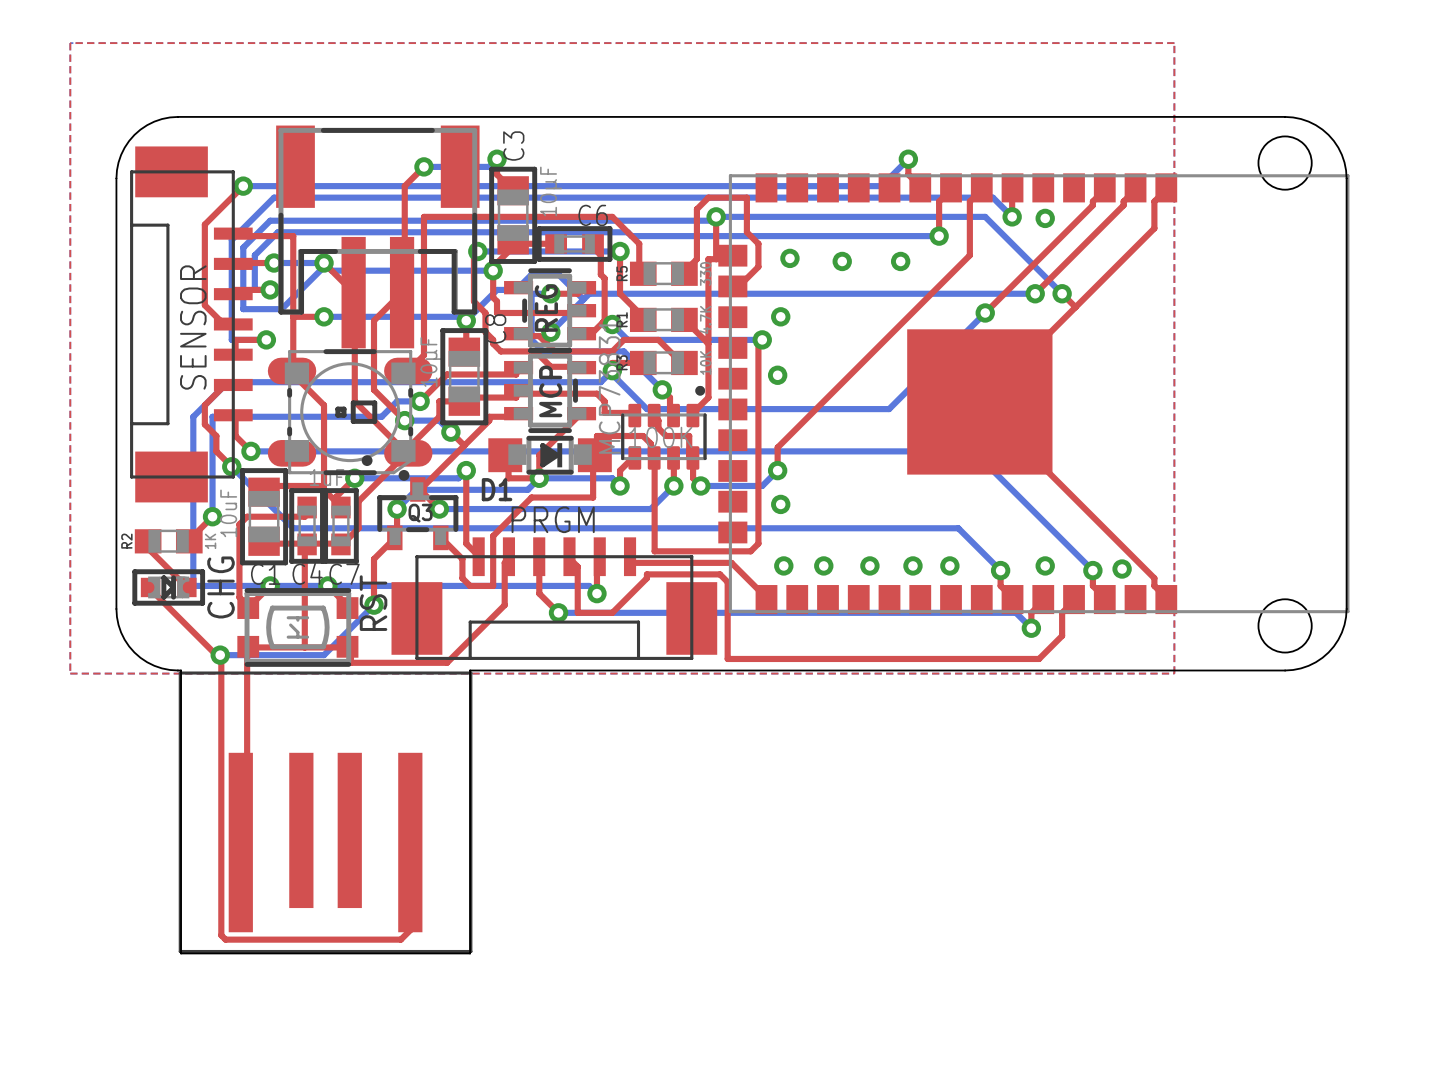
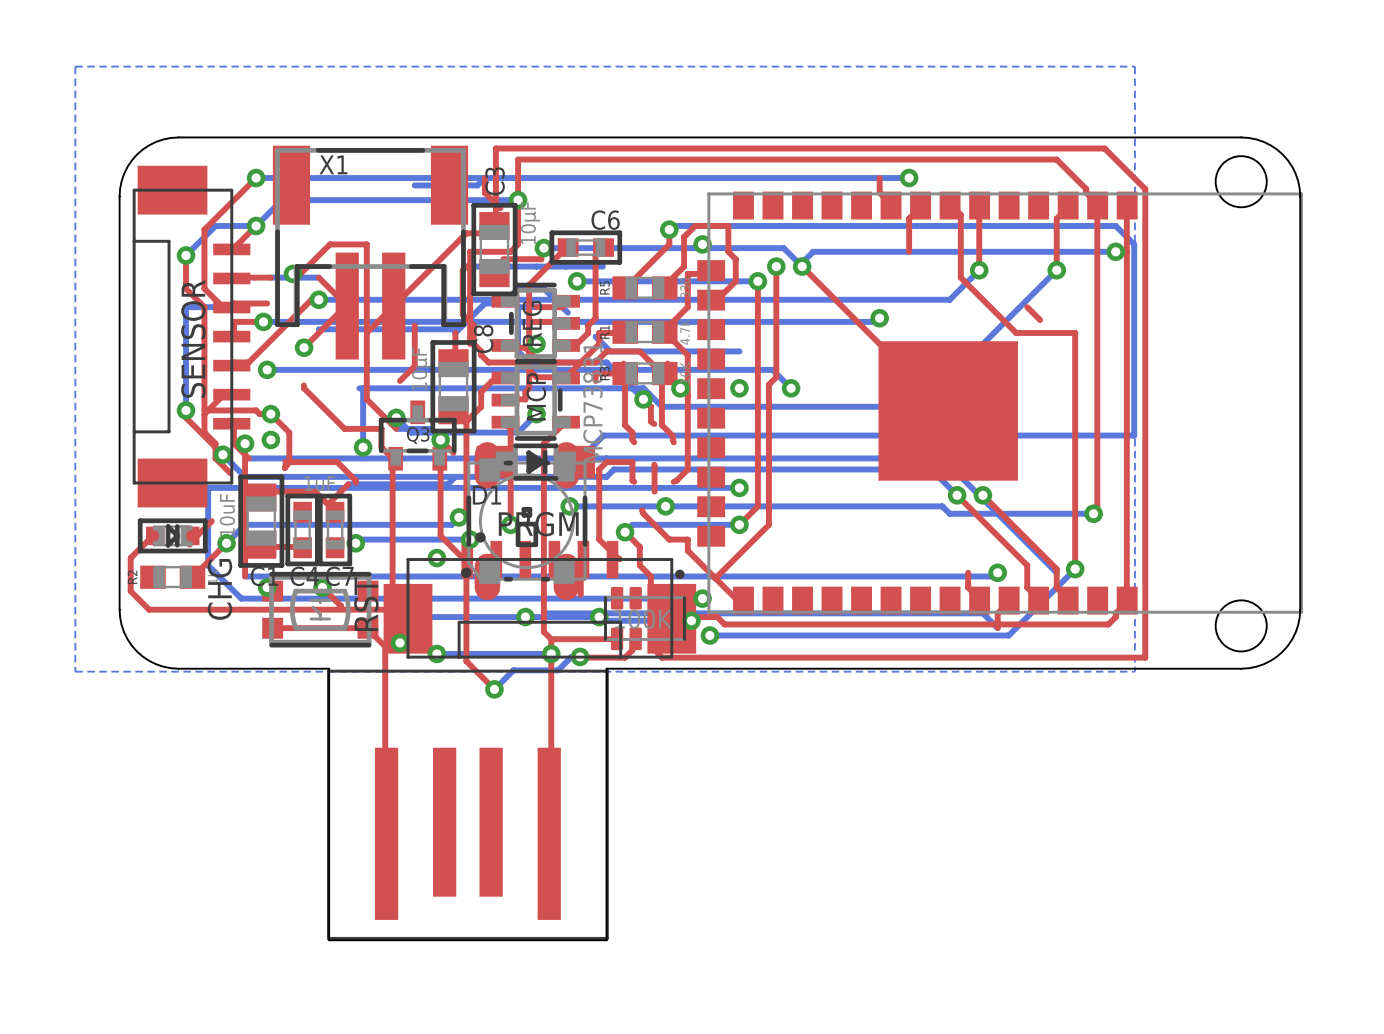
top zone outline: (70, 43) (70, 673) (1174, 673) (1174, 43) (70, 43) -> none
X1 name: none -> X1 (333, 164)
bottom track: none -> (256, 178) (909, 178)
via: none -> (256, 178)
via position: (497, 159) -> (518, 200)
bottom track: (908, 159) (881, 186) (243, 186) -> none
via position: (908, 159) -> (909, 178)
top track: (423, 166) (404, 186) (404, 289) -> none
via: (423, 166) -> none
bottom track: none -> (518, 200) (281, 200) (256, 225) (215, 225) (186, 255)
top track: (243, 186) (204, 224) -> (256, 178) (204, 229) (204, 240)
via: (243, 186) -> none
top track: (981, 187) (969, 201) (969, 255) (777, 447) (777, 470) -> (950, 205) (960, 214) (960, 277) (1016, 332) (1075, 332) (1075, 569)
top track: none -> (1097, 205) (1086, 192) (1086, 189) (1056, 159) (518, 159) (518, 244) (510, 251) (470, 251) (470, 344)
top track: (1135, 189) (1123, 201) (1123, 205) (1035, 293) -> (1097, 207) (1097, 510) (1093, 513)
top track: (1165, 189) (1154, 201) (1154, 228) (979, 401) (1154, 578) (1154, 585) (1165, 597) -> (1126, 207) (1126, 598)
top track: (1092, 205) (985, 312) -> (1056, 222) (1056, 270)
via: none -> (256, 225)
bottom track: none -> (669, 229) (673, 225) (1115, 225) (1134, 244) (1134, 435) (603, 435) (591, 447)
via: none -> (669, 229)
C3 position: (513, 215) -> (494, 249)
top track: (477, 216) (423, 216) (423, 312) -> (466, 233) (396, 303)
top track: (504, 216) (612, 216) (639, 243) (639, 266) (643, 273) -> (669, 229) (669, 244) (625, 287)
top track: none -> (492, 233) (492, 225) (495, 225) (495, 148) (1104, 148) (1145, 189) (1145, 657) (1005, 657)
top track: (716, 216) (716, 259) -> none
via position: (716, 216) -> (702, 244)
top track: none -> (979, 233) (979, 270)
bottom track: (1012, 216) (992, 197) (274, 197) (231, 239) (231, 339) (266, 339) -> none
via: (1012, 216) -> none
via: (1045, 218) -> none
top track: none -> (568, 247) (529, 285) (529, 388) (525, 392) (525, 399) (505, 400)
bottom track: (558, 232) (277, 232) (254, 255) (254, 289) (270, 289) -> none
via: none -> (543, 248)
bottom track: (627, 232) (631, 236) (839, 236) -> (610, 248) (698, 248) (702, 244) (702, 248) (783, 248) (802, 266) (802, 262) (813, 251)
top track: (233, 233) (235, 236) (293, 236) (292, 371) (324, 405) (324, 485) (322, 487) -> (231, 249) (256, 225)
top track: (750, 236) (746, 232) (746, 197) (708, 197) (696, 209) (696, 259) -> (728, 251) (728, 225) (695, 225) (684, 237) (684, 266) (676, 273)
bottom track: none -> (909, 251) (1115, 251)
via: (939, 236) -> none
via: none -> (1115, 251)
top track: none -> (186, 255) (186, 288) (204, 307)
via: none -> (186, 255)
top track: (516, 243) (493, 266) (493, 297) (497, 301) (497, 312) (577, 312) (581, 310) -> (529, 321) (565, 323)
C6 position: (574, 243) -> (585, 247)
top track: (593, 243) (593, 247) (600, 255) (600, 274) (604, 278) (604, 312) -> (603, 247) (595, 255) (595, 318) (588, 325)
via: (477, 251) -> none
top track: (620, 251) (620, 293) (643, 316) (643, 319) -> (565, 378) (599, 344) (599, 332) (625, 332)
via: (620, 251) -> none
top track: none -> (776, 266) (776, 377) (768, 384) (768, 524) (715, 578)
via: none -> (776, 266)
top track: none -> (802, 266) (948, 410)
bottom track: none -> (979, 270) (949, 299) (318, 299)
via: none -> (979, 270)
bottom track: none -> (1056, 270) (920, 406) (661, 406) (643, 388) (359, 388)
via: none -> (1056, 270)
via: (789, 258) -> none
top track: none -> (293, 273) (300, 273) (329, 244) (366, 244) (366, 332)
via: none -> (293, 273)
via position: (842, 261) -> (802, 266)
via: (900, 261) -> none
via: (274, 263) -> none
via: (324, 263) -> none
bottom track: none -> (577, 281) (757, 281)
via: none -> (577, 281)
top track: none -> (757, 281) (757, 506) (739, 524)
via: none -> (757, 281)
bottom track: (493, 270) (331, 270) (324, 263) (324, 266) (281, 309) -> (879, 318) (875, 321) (278, 321)
via: (493, 270) -> none
top track: (204, 274) (204, 293) -> (204, 288) (222, 307) (231, 307)
via: none -> (318, 299)
via position: (270, 289) -> (263, 321)
bottom track: none -> (231, 304) (230, 307) (186, 307) (186, 410)
top track: (353, 292) (354, 401) (408, 453) -> (347, 306) (304, 347)
via: (550, 293) -> none
top track: (708, 293) (708, 339) (706, 341) -> (687, 307) (664, 332)
bottom track: (1035, 293) (589, 293) (550, 332) -> none
via: (1035, 293) -> none
bottom track: (1062, 293) (985, 216) (716, 216) (712, 220) (270, 220) (243, 247) (243, 309) (266, 309) -> none
via: (1062, 293) -> none
top track: (204, 305) (220, 320) (231, 320) (233, 324) -> (263, 321) (233, 321) (233, 332) (231, 336)
top track: none -> (204, 318) (204, 410) (256, 410) (259, 414) (270, 414) (289, 432) (289, 462) (284, 468) (285, 462) (337, 462) (355, 482)
via: none -> (879, 318)
bottom track: (985, 312) (889, 409) (646, 409) (612, 374) (612, 370) (600, 382) (227, 382) (193, 416) (193, 585) (589, 585) (596, 593) -> none
via: (985, 312) -> none
top track: (293, 316) (324, 316) -> none
via: (324, 316) -> none
via: (780, 316) -> none
via: (466, 320) -> none
via: (612, 324) -> none
via: none -> (304, 347)
top track: (266, 339) (235, 339) (235, 351) -> (318, 299) (311, 299) (248, 362) (233, 362)
via position: (266, 339) -> (267, 369)
top track: (762, 339) (758, 343) (758, 543) (750, 551) (654, 551) (654, 459) (650, 455) (650, 443) (643, 436) (596, 436) (596, 455) (593, 455) (593, 497) (531, 497) (493, 535) (493, 585) (470, 585) (462, 578) (462, 559) (440, 537) -> none
via: (762, 339) -> none
top track: none -> (623, 363) (625, 425) (632, 432) (634, 442)
top track: none -> (667, 363) (661, 369) (661, 425) (673, 436) (673, 442)
bottom track: none -> (267, 369) (772, 369) (791, 388)
top track: (516, 370) (516, 374) (447, 374) (420, 401) -> (503, 380) (492, 380) (481, 392) (481, 406) (466, 421) (466, 510) (459, 517)
via: (612, 370) -> none
top track: none -> (303, 385) (304, 388) (344, 428) (381, 428) (381, 447) (392, 458) (395, 458) (392, 462) (392, 609)
via position: (777, 375) -> (739, 388)
bottom track: none -> (363, 388) (363, 447)
via: none -> (680, 388)
via: none -> (791, 388)
top track: (708, 397) (693, 412) (692, 415) -> (687, 406) (687, 469) (673, 481)
top track: none -> (186, 410) (186, 417) (222, 454)
via: none -> (186, 410)
bottom track: (420, 401) (397, 401) (381, 416) (212, 416) (212, 516) -> none
via: (420, 401) -> none
via: none -> (270, 414)
bottom track: none -> (536, 414) (518, 432) (411, 432) (396, 417)
via: none -> (536, 414)
via: none -> (396, 417)
top track: (518, 413) (516, 416) (489, 416) (489, 420) (423, 485) (423, 489) (417, 489) (439, 509) -> (505, 422) (510, 428) (510, 524)
part rotation: 0° (350, 414) -> 90° clockwise (524, 521)
part position: (350, 414) -> (524, 521)
top track: (634, 415) (631, 412) (604, 412) (604, 401) (596, 393) (520, 393) (518, 390) (516, 397) (466, 397) (464, 401) (439, 401) (439, 416) (408, 447) (408, 453) -> none
top track: (654, 415) (658, 420) (658, 428) (666, 436) (689, 436) (689, 455) (693, 459) (693, 478) (700, 485) -> none
via: (404, 420) -> none
top track: none -> (436, 432) (436, 458) (439, 458) (440, 462) (440, 535) (466, 561) (466, 661) (494, 689)
part position: (663, 427) -> (644, 609)
via: none -> (270, 439)
top track: none -> (245, 443) (245, 576)
top track: (558, 436) (539, 455) (539, 478) (508, 478) (508, 455) (505, 455) -> (543, 443) (543, 631) (551, 639)
via: none -> (363, 447)
bottom track: none -> (222, 454) (245, 476) (606, 476) (613, 469) (931, 469) (957, 495)
via position: (250, 451) -> (245, 443)
top track: (408, 453) (358, 501) (358, 528) (343, 543) (308, 543) (304, 547) (304, 647) -> none
top track: (634, 457) (620, 470) (620, 485) -> none
bottom track: (231, 466) (293, 528) (958, 528) (1000, 570) -> none
via position: (231, 466) -> (222, 454)
top track: (466, 470) (466, 543) (478, 556) -> none
via: (466, 470) -> none
bottom track: (777, 470) (762, 485) (700, 485) -> none
via position: (777, 470) -> (739, 487)
top track: none -> (634, 481) (632, 480) (632, 462) (606, 462) (599, 469) (599, 539) (619, 559)
via: (354, 478) -> none
via: (539, 478) -> none
bottom track: none -> (739, 487) (208, 487) (208, 565) (241, 598) (702, 598)
bottom track: (620, 485) (612, 478) (539, 478) (527, 489) (416, 489) (397, 509) -> none
via: (620, 485) -> none
bottom track: (673, 485) (650, 509) (439, 509) -> none
via: (673, 485) -> none
via: (700, 485) -> none
via: none -> (957, 495)
top track: none -> (982, 495) (1056, 569) (1056, 572)
via: none -> (982, 495)
bottom track: none -> (569, 506) (942, 506) (949, 513) (1093, 513)
via: none -> (569, 506)
via: none -> (665, 506)
via: (780, 504) -> none
top track: (307, 507) (304, 509) (304, 516) (247, 516) (239, 524) (239, 597) (248, 608) (270, 585) -> none
top track: (397, 509) (397, 535) (374, 559) (374, 605) -> none
via: (397, 509) -> none
via: (439, 509) -> none
via: none -> (1093, 513)
bottom track: none -> (459, 517) (451, 524) (245, 524) (226, 543)
via: none -> (459, 517)
Q3 position: (417, 513) -> (417, 435)
via position: (212, 516) -> (226, 543)
via: none -> (510, 524)
bottom track: none -> (739, 524) (632, 524) (625, 532)
via: none -> (739, 524)
top track: none -> (625, 532) (639, 546) (639, 565) (650, 576) (650, 594) (654, 598)
via: none -> (625, 532)
top track: none -> (155, 535) (152, 535) (130, 558) (130, 591) (149, 609) (392, 609)
bottom track: none -> (470, 539) (359, 539) (355, 543)
via: none -> (470, 539)
top track: none -> (226, 543) (192, 577)
via: none -> (355, 543)
top track: (148, 541) (151, 543) (151, 551) (186, 587) -> none
R2 position: (168, 541) -> (172, 577)
via: none -> (436, 558)
top track: (508, 556) (504, 562) (504, 605) (447, 662) (350, 662) (350, 647) (347, 646) (247, 647) (247, 835) (240, 842) -> none
top track: (539, 556) (539, 593) (558, 612) -> none
top track: (569, 556) (577, 566) (577, 612) (612, 612) (646, 578) (646, 574) (719, 574) (727, 582) (727, 658) -> (654, 639) (658, 642) (658, 653) (661, 657) (706, 657)
top track: (630, 556) (631, 562) (731, 562) (766, 597) -> (642, 510) (669, 539) (687, 539) (687, 550) (735, 598) (743, 598)
via: (783, 565) -> none
via: (823, 565) -> none
via: (869, 565) -> none
via: (912, 565) -> none
via: (949, 565) -> none
via position: (1045, 565) -> (997, 572)
bottom track: none -> (1075, 569) (1008, 635) (709, 635)
via: none -> (1075, 569)
via: (1122, 569) -> none
via: (1000, 570) -> none
bottom track: none -> (997, 572) (994, 576) (245, 576)
via: (1092, 570) -> none
top track: (150, 587) (218, 657) (221, 656) (221, 935) (225, 939) (400, 939) (410, 930) (410, 842) -> none
part position: (168, 587) -> (172, 535)
via: (596, 593) -> none
top track: none -> (673, 598) (673, 602) (691, 620) (691, 617) (717, 617) (724, 624) (1108, 624) (1127, 600)
via: none -> (702, 598)
top track: (1074, 599) (1062, 612) (1062, 635) (1039, 658) -> (1038, 600) (1027, 587) (1027, 565) (957, 495)
bottom track: (374, 605) (324, 655) (220, 655) -> none
via: (374, 605) -> none
via position: (558, 612) -> (525, 617)
via: none -> (599, 617)
bottom track: none -> (691, 620) (602, 620) (599, 617) (425, 617) (400, 642)
via: none -> (691, 620)
part position: (297, 627) -> (320, 609)
top track: none -> (272, 628) (367, 628) (385, 646) (386, 833)
via: (1031, 628) -> none
via: none -> (709, 635)
top track: none -> (551, 639) (551, 831) (549, 833)
top track: none -> (617, 638) (551, 639)
top track: none -> (635, 638) (632, 639) (632, 650) (625, 657) (580, 656)
via: none -> (400, 642)
via: (220, 655) -> none
bottom track: none -> (436, 653) (551, 653)
via: none -> (436, 653)
via: none -> (551, 653)
bottom track: none -> (580, 656) (571, 656) (558, 670) (513, 670) (494, 689)
via: none -> (580, 656)
board edge: (181, 670) (181, 953) (334, 953) -> (181, 668) (329, 668) (329, 940)
board edge: (623, 670) (470, 670) (470, 953) -> (606, 668) (606, 940) (459, 940)
via: none -> (494, 689)
part position: (325, 812) -> (467, 804)

